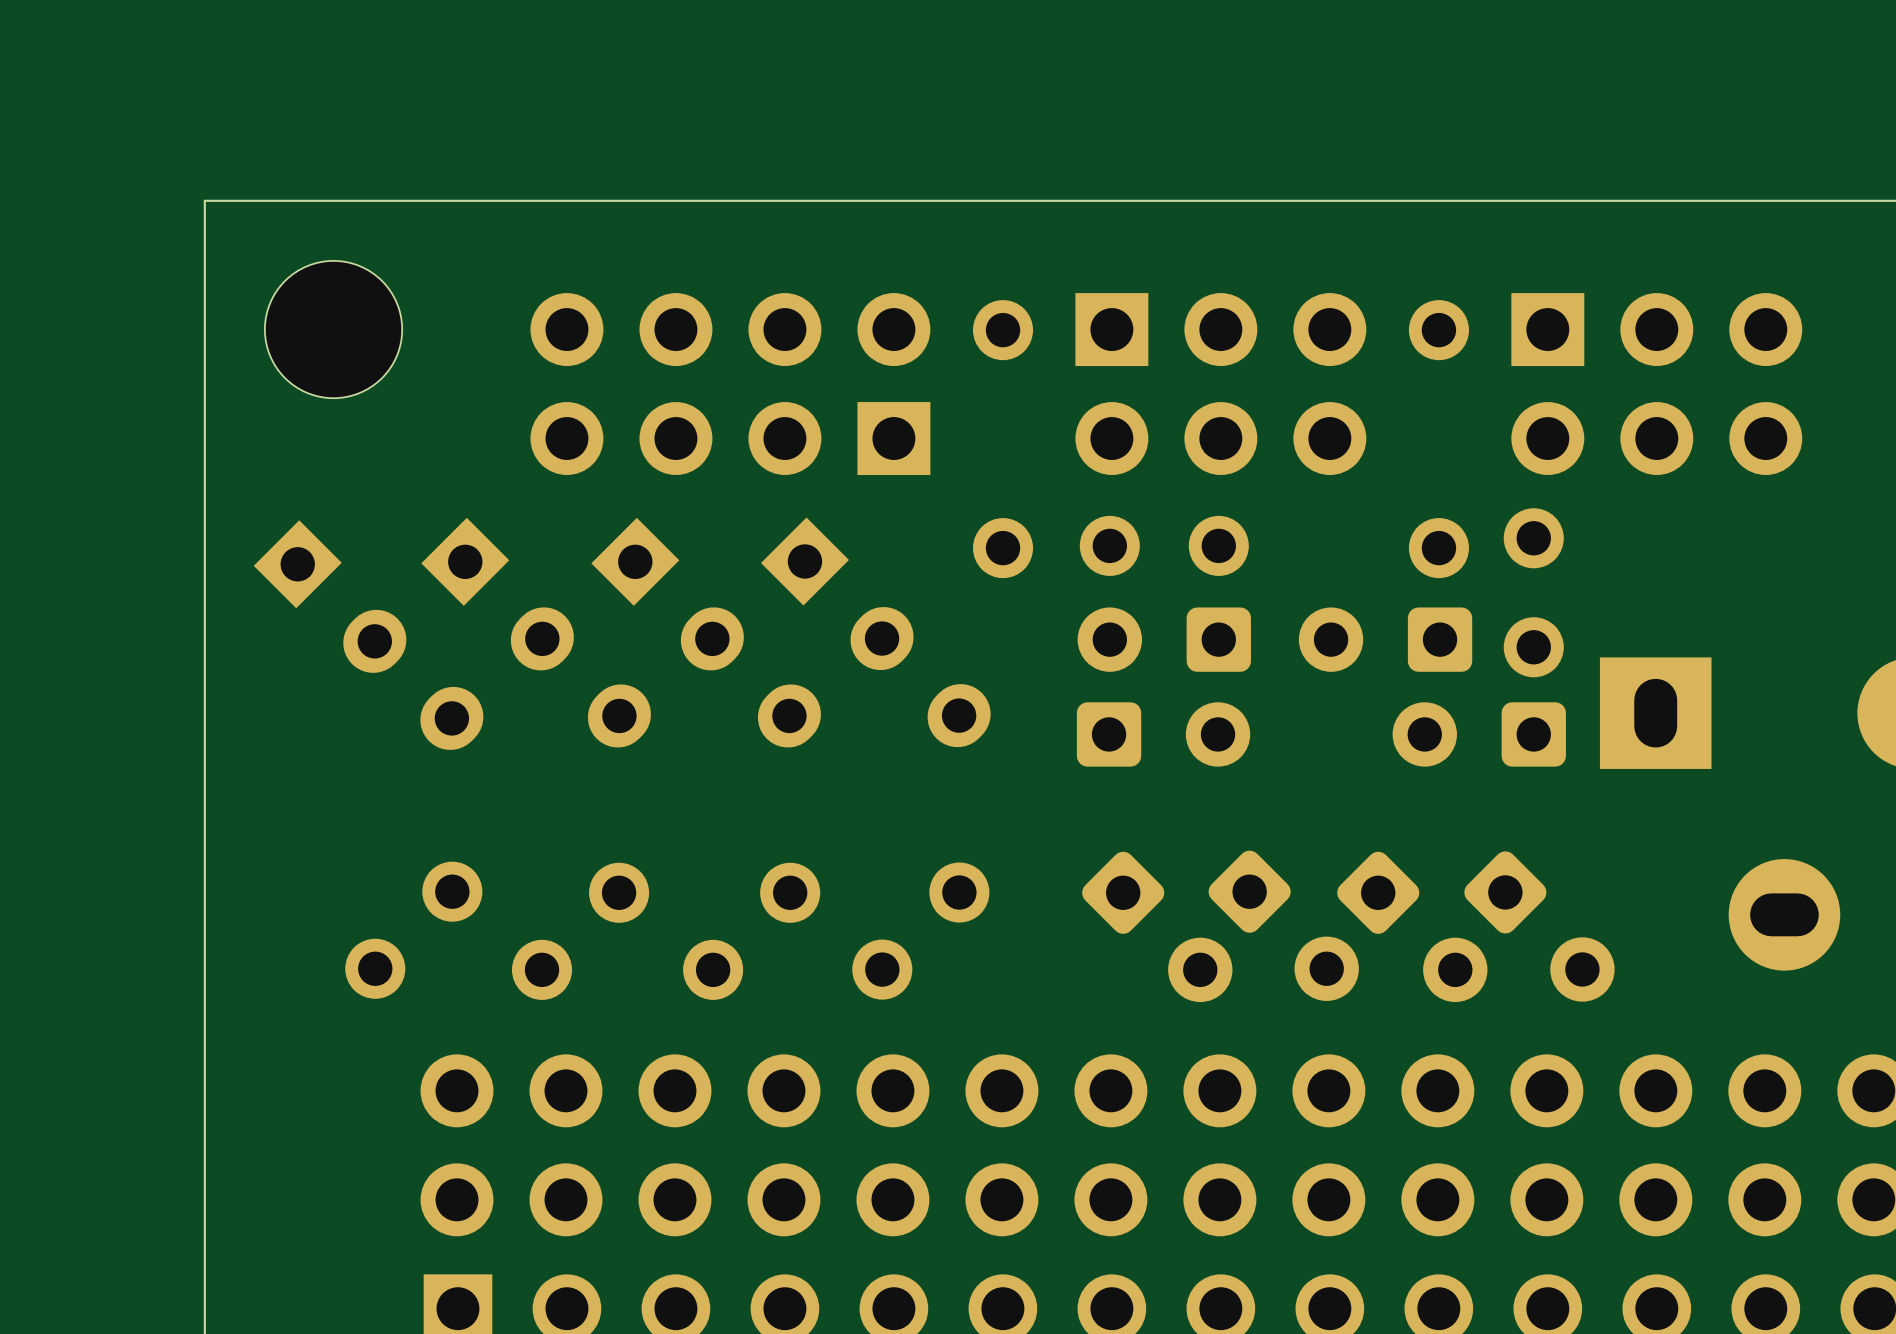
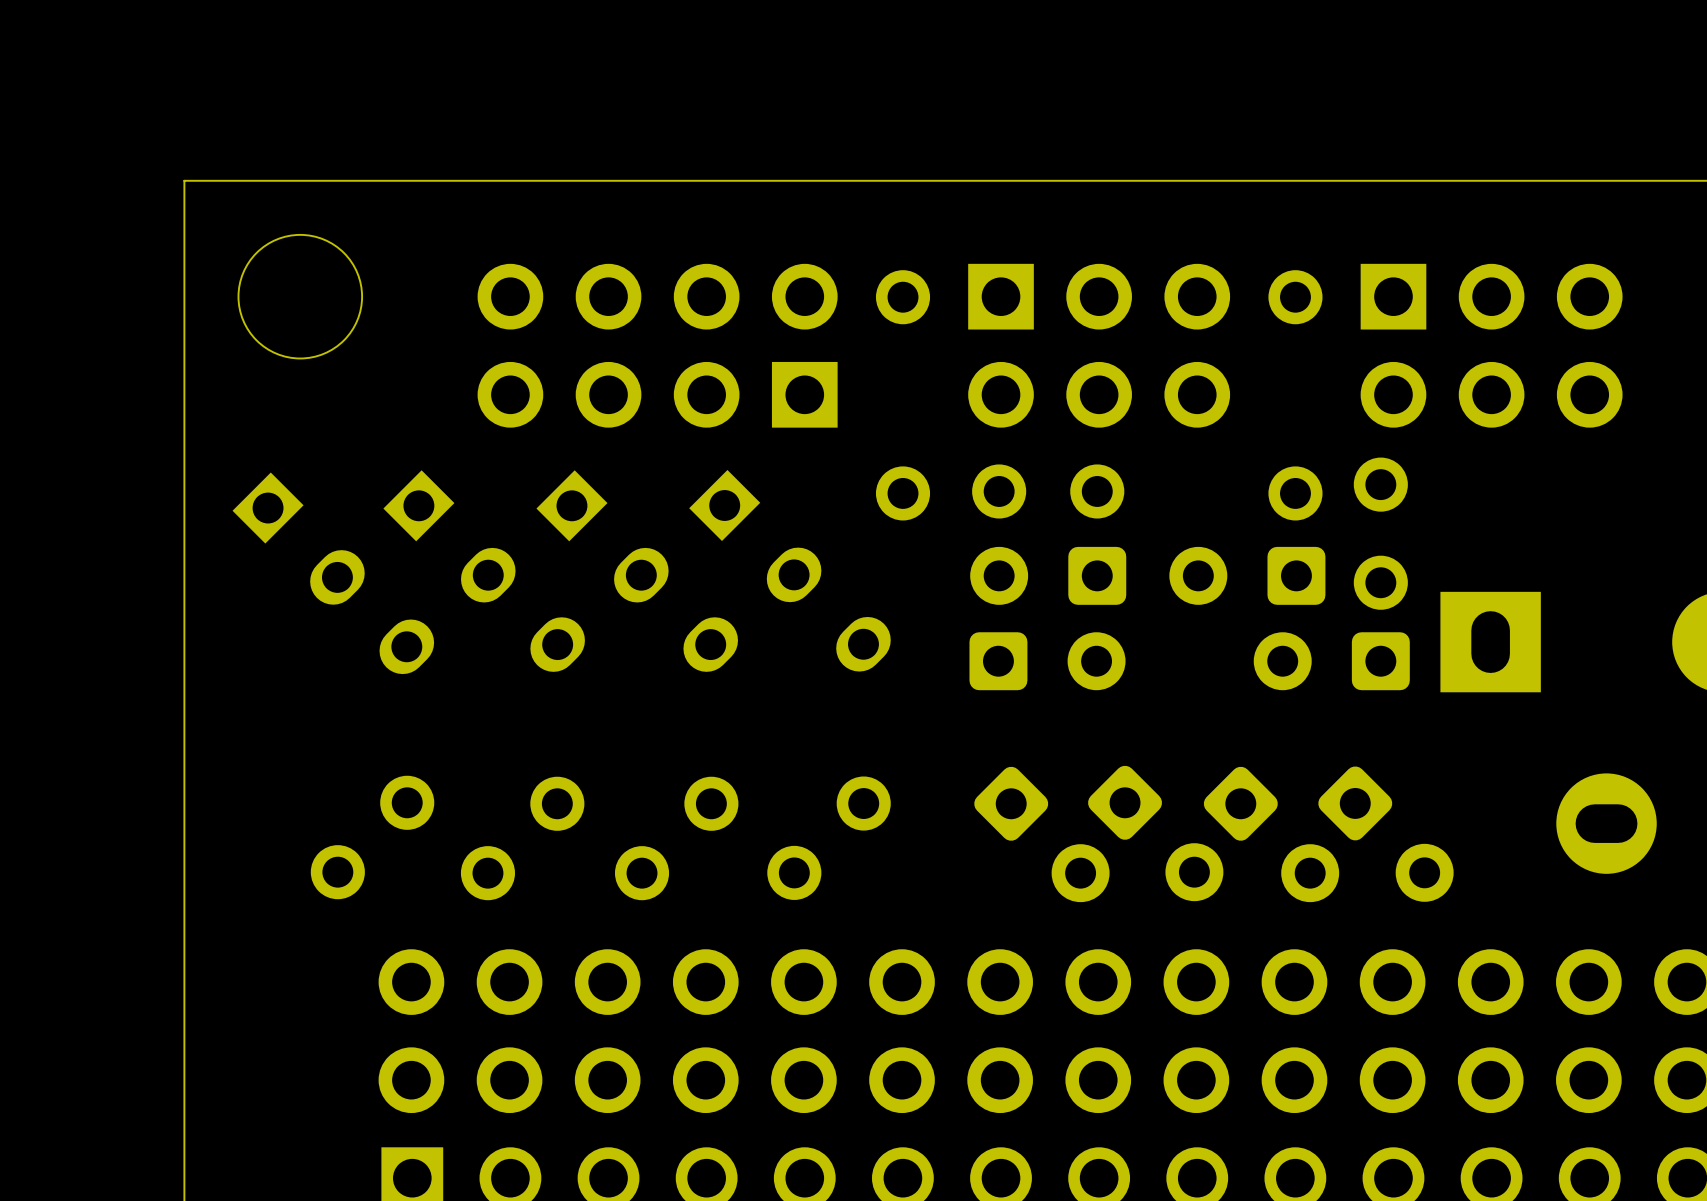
part footprint: [421, 517, 651, 748] -> [383, 470, 585, 672]
part footprint: [591, 517, 821, 748] -> [536, 470, 738, 672]
part footprint: [760, 517, 991, 748] -> [689, 469, 891, 672]
part footprint: [253, 520, 484, 750] -> [232, 472, 435, 675]

